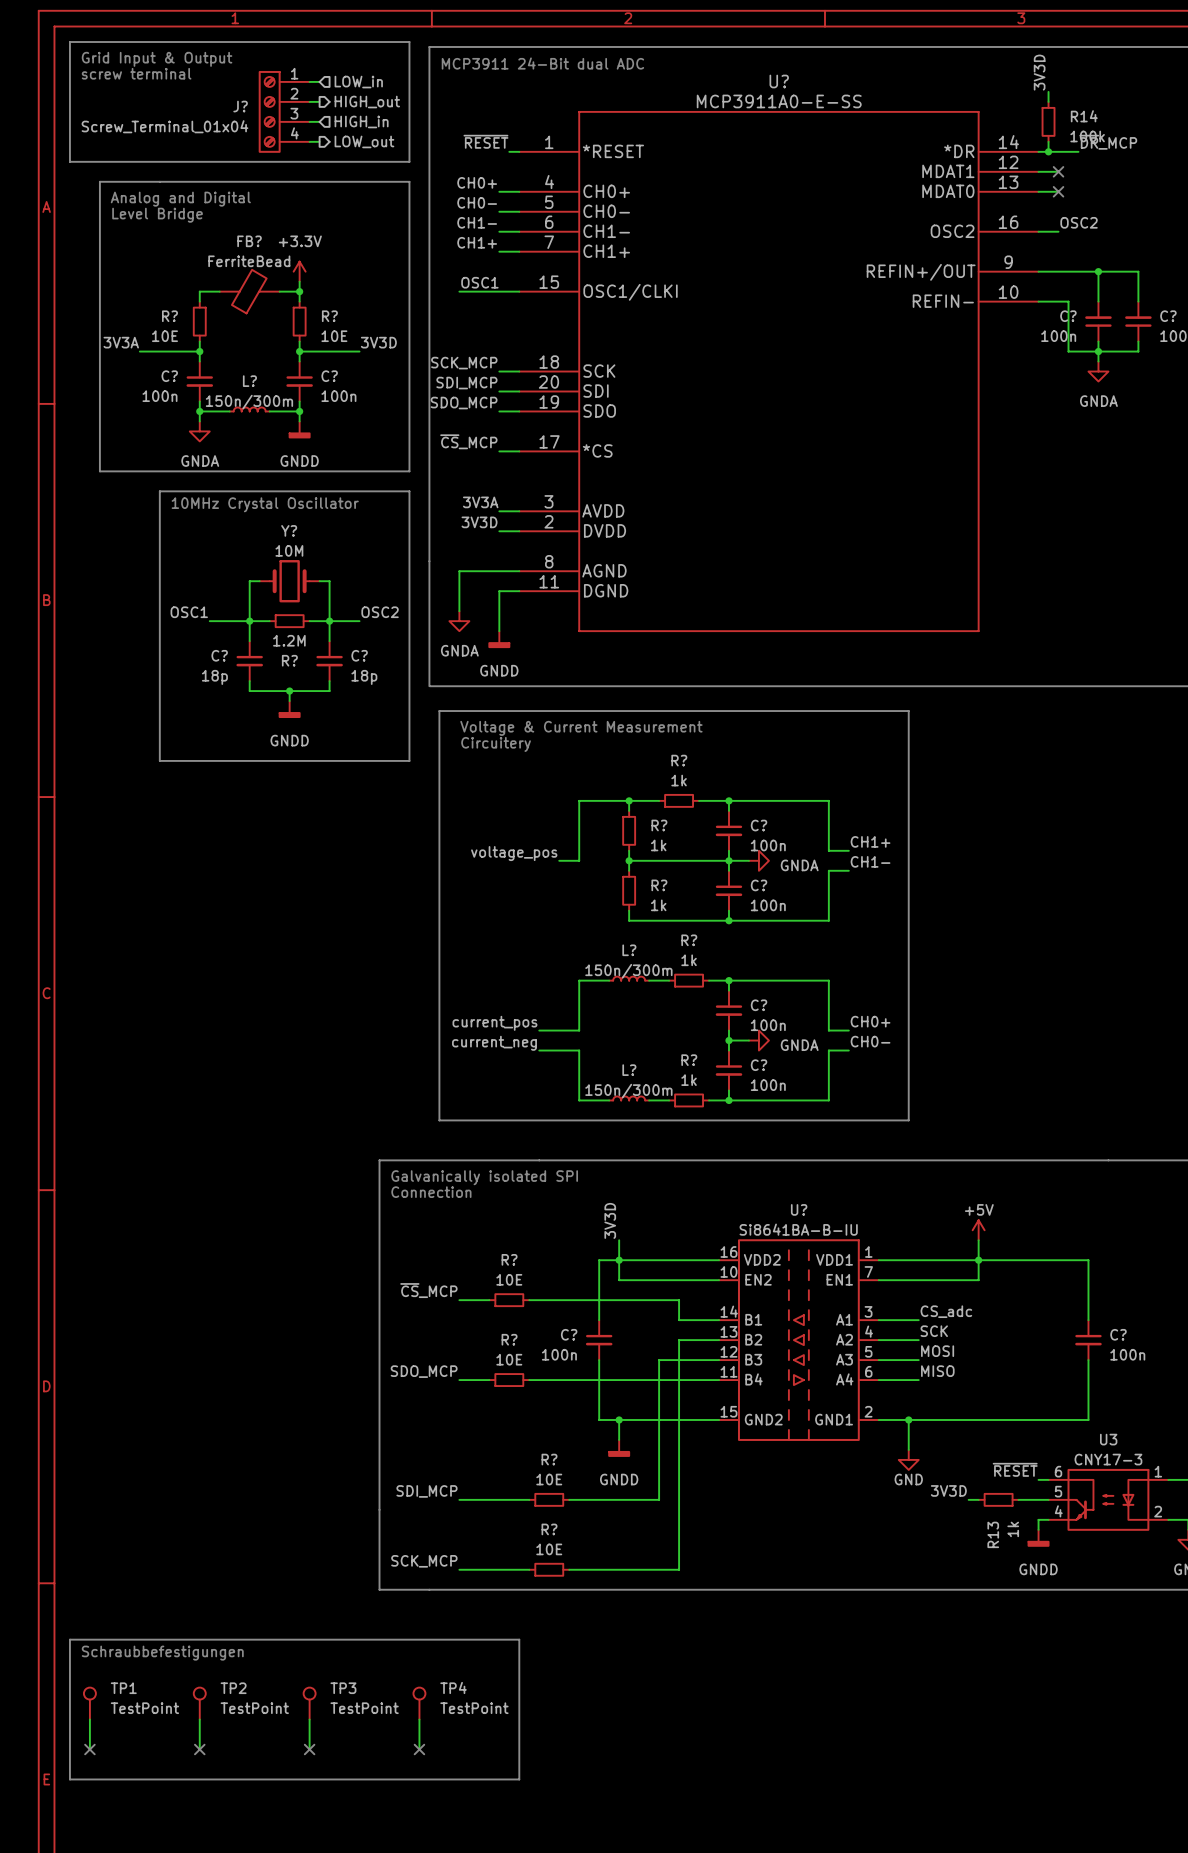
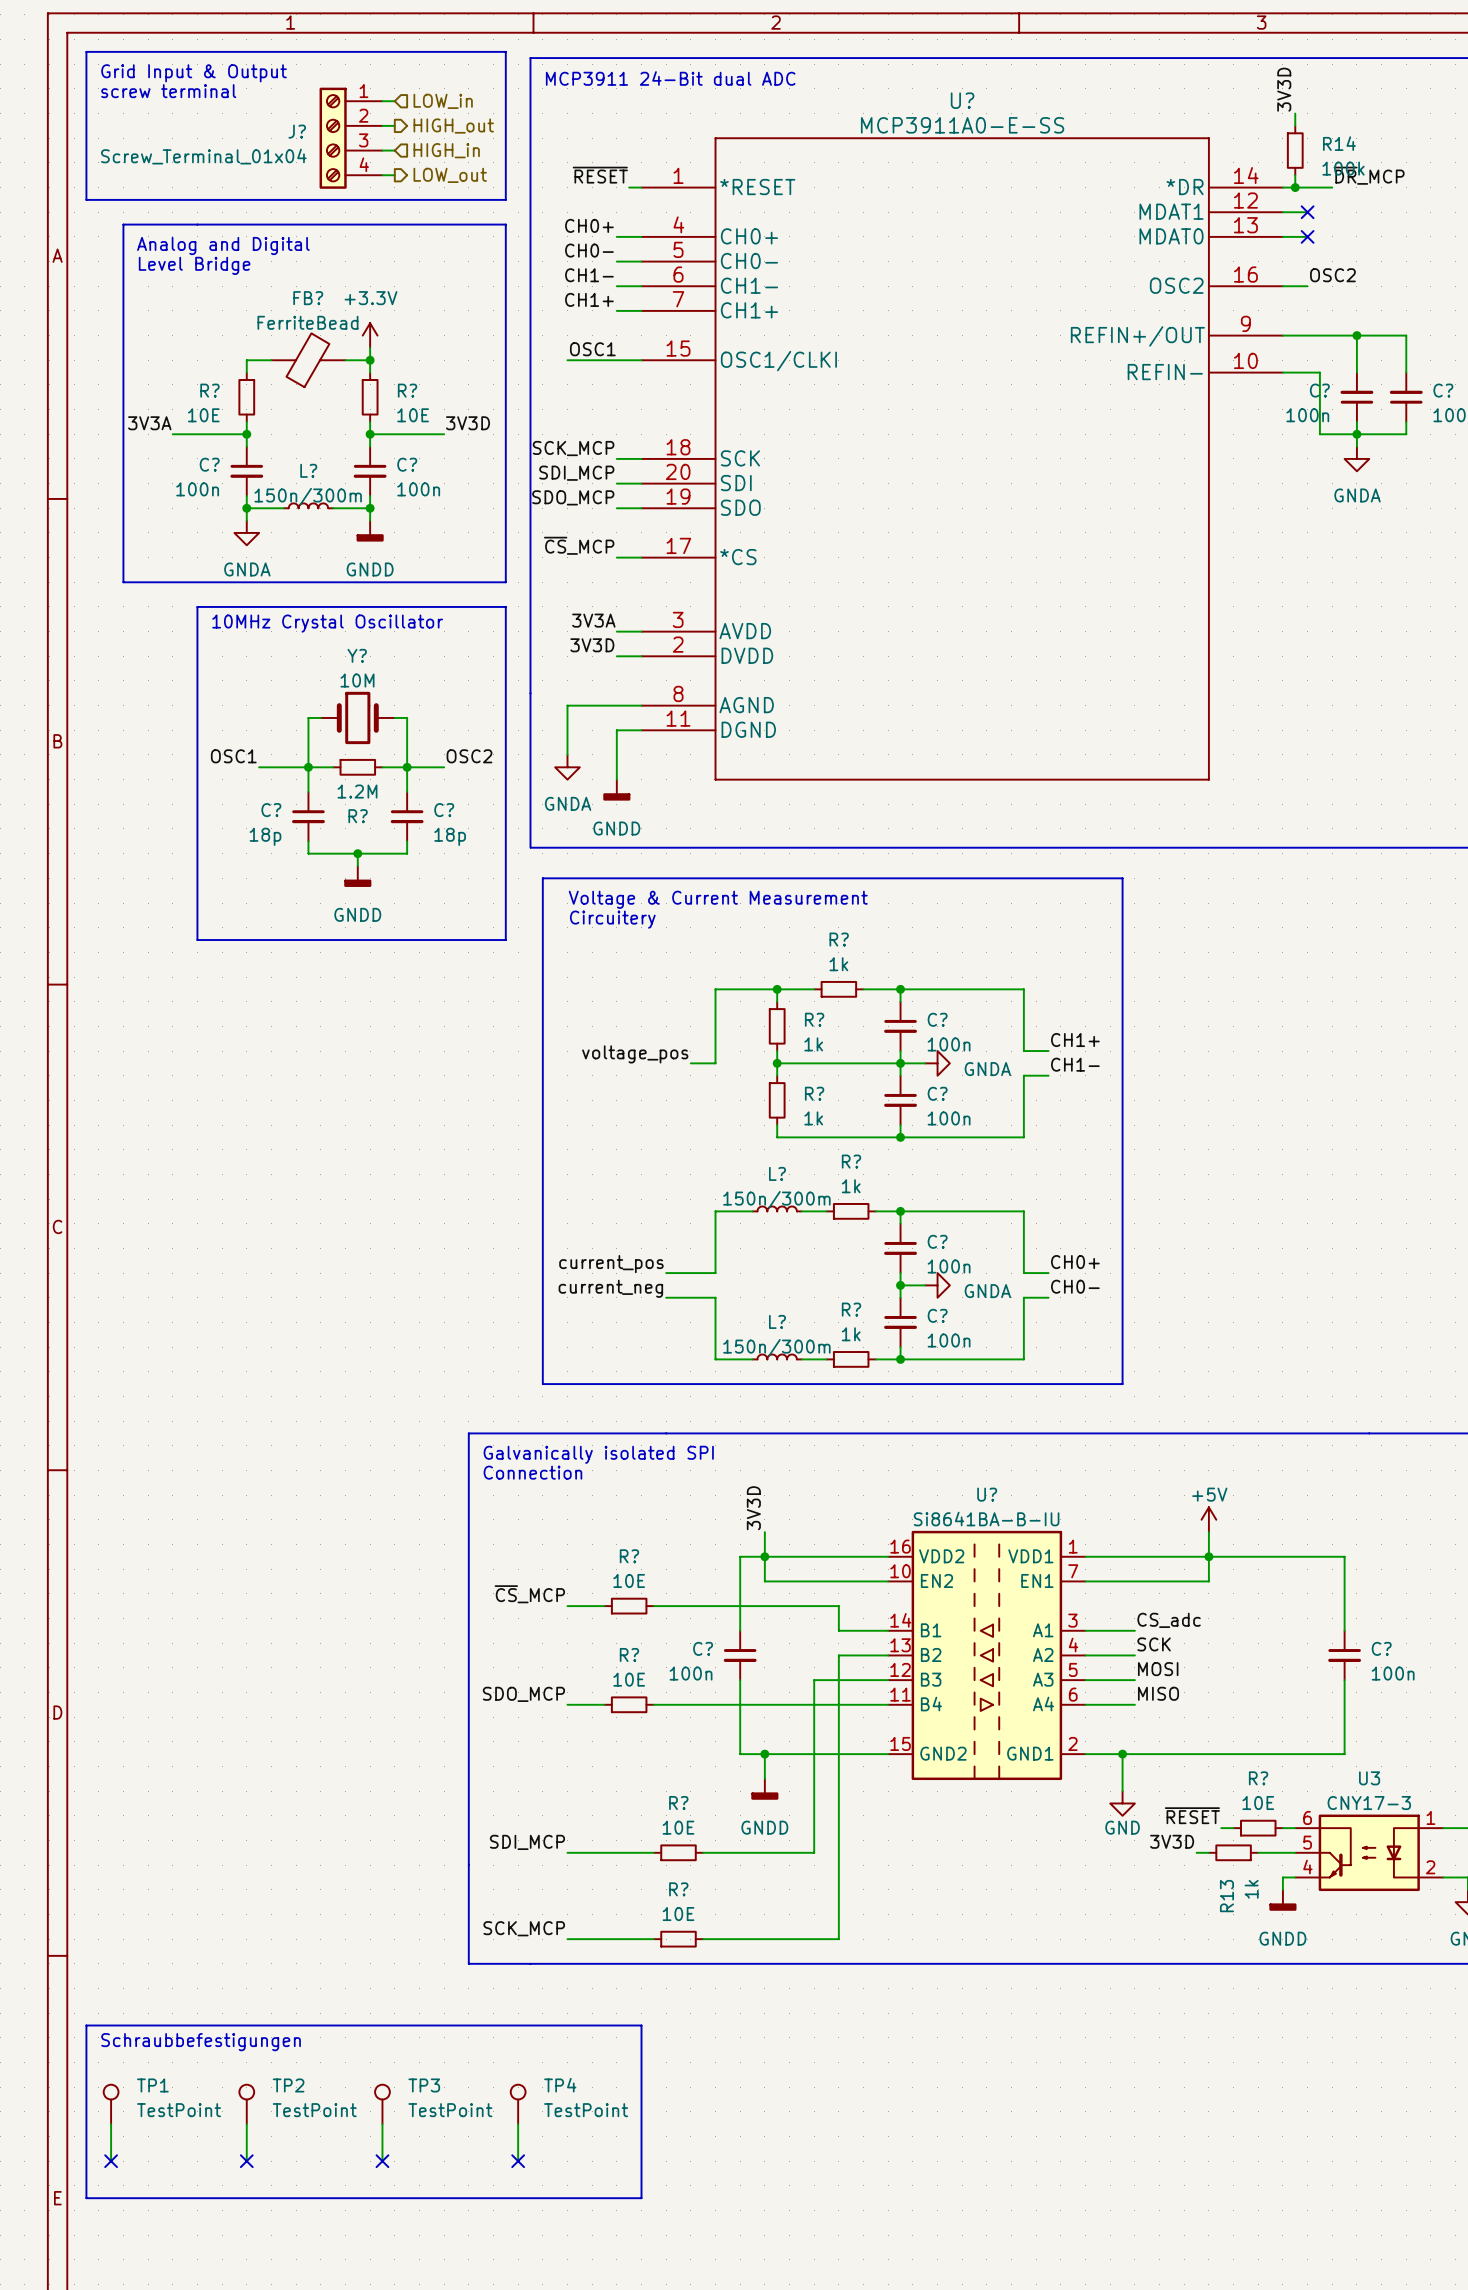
label position: ~{RESET} (1015, 1469) -> ~{RESET} (1192, 1815)
wire: none -> (1221, 1828) (1233, 1828)
R?: none -> 10E (1258, 1828)

